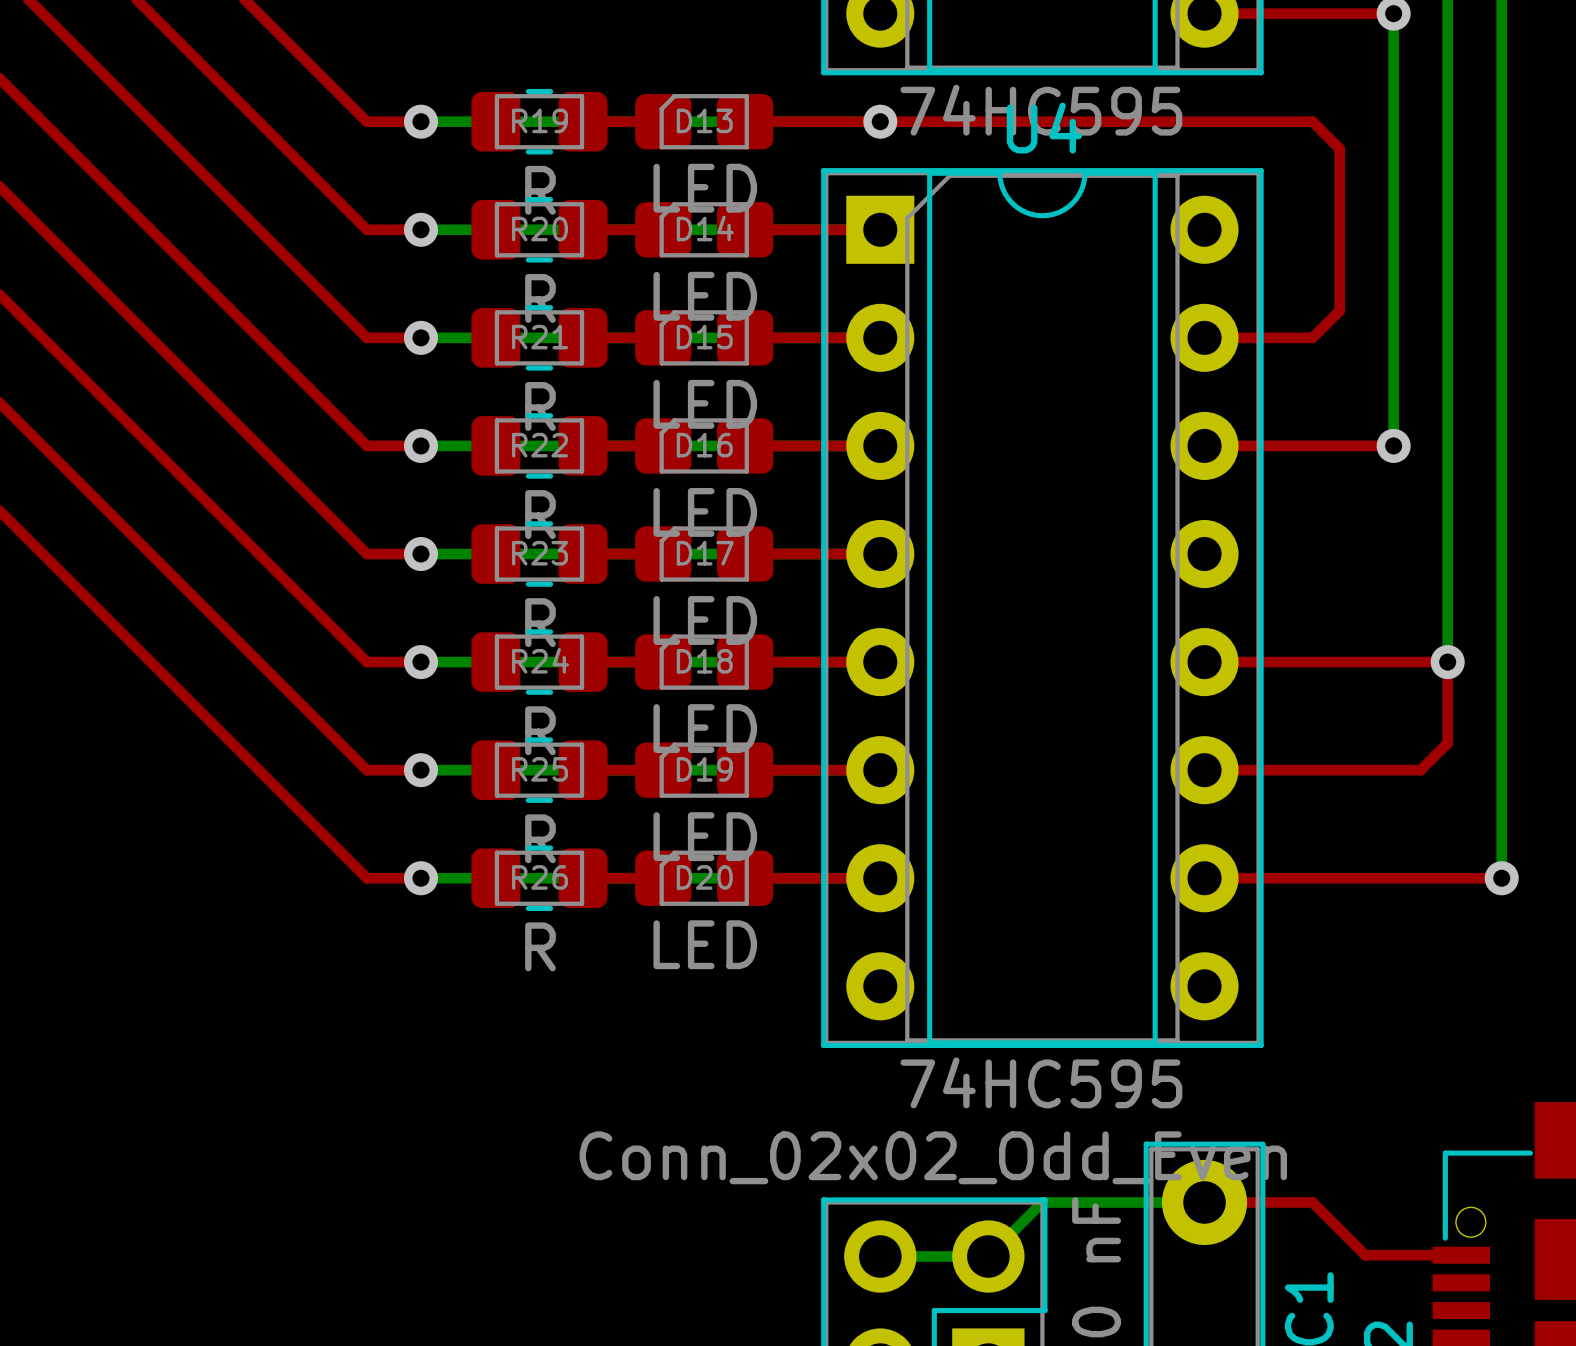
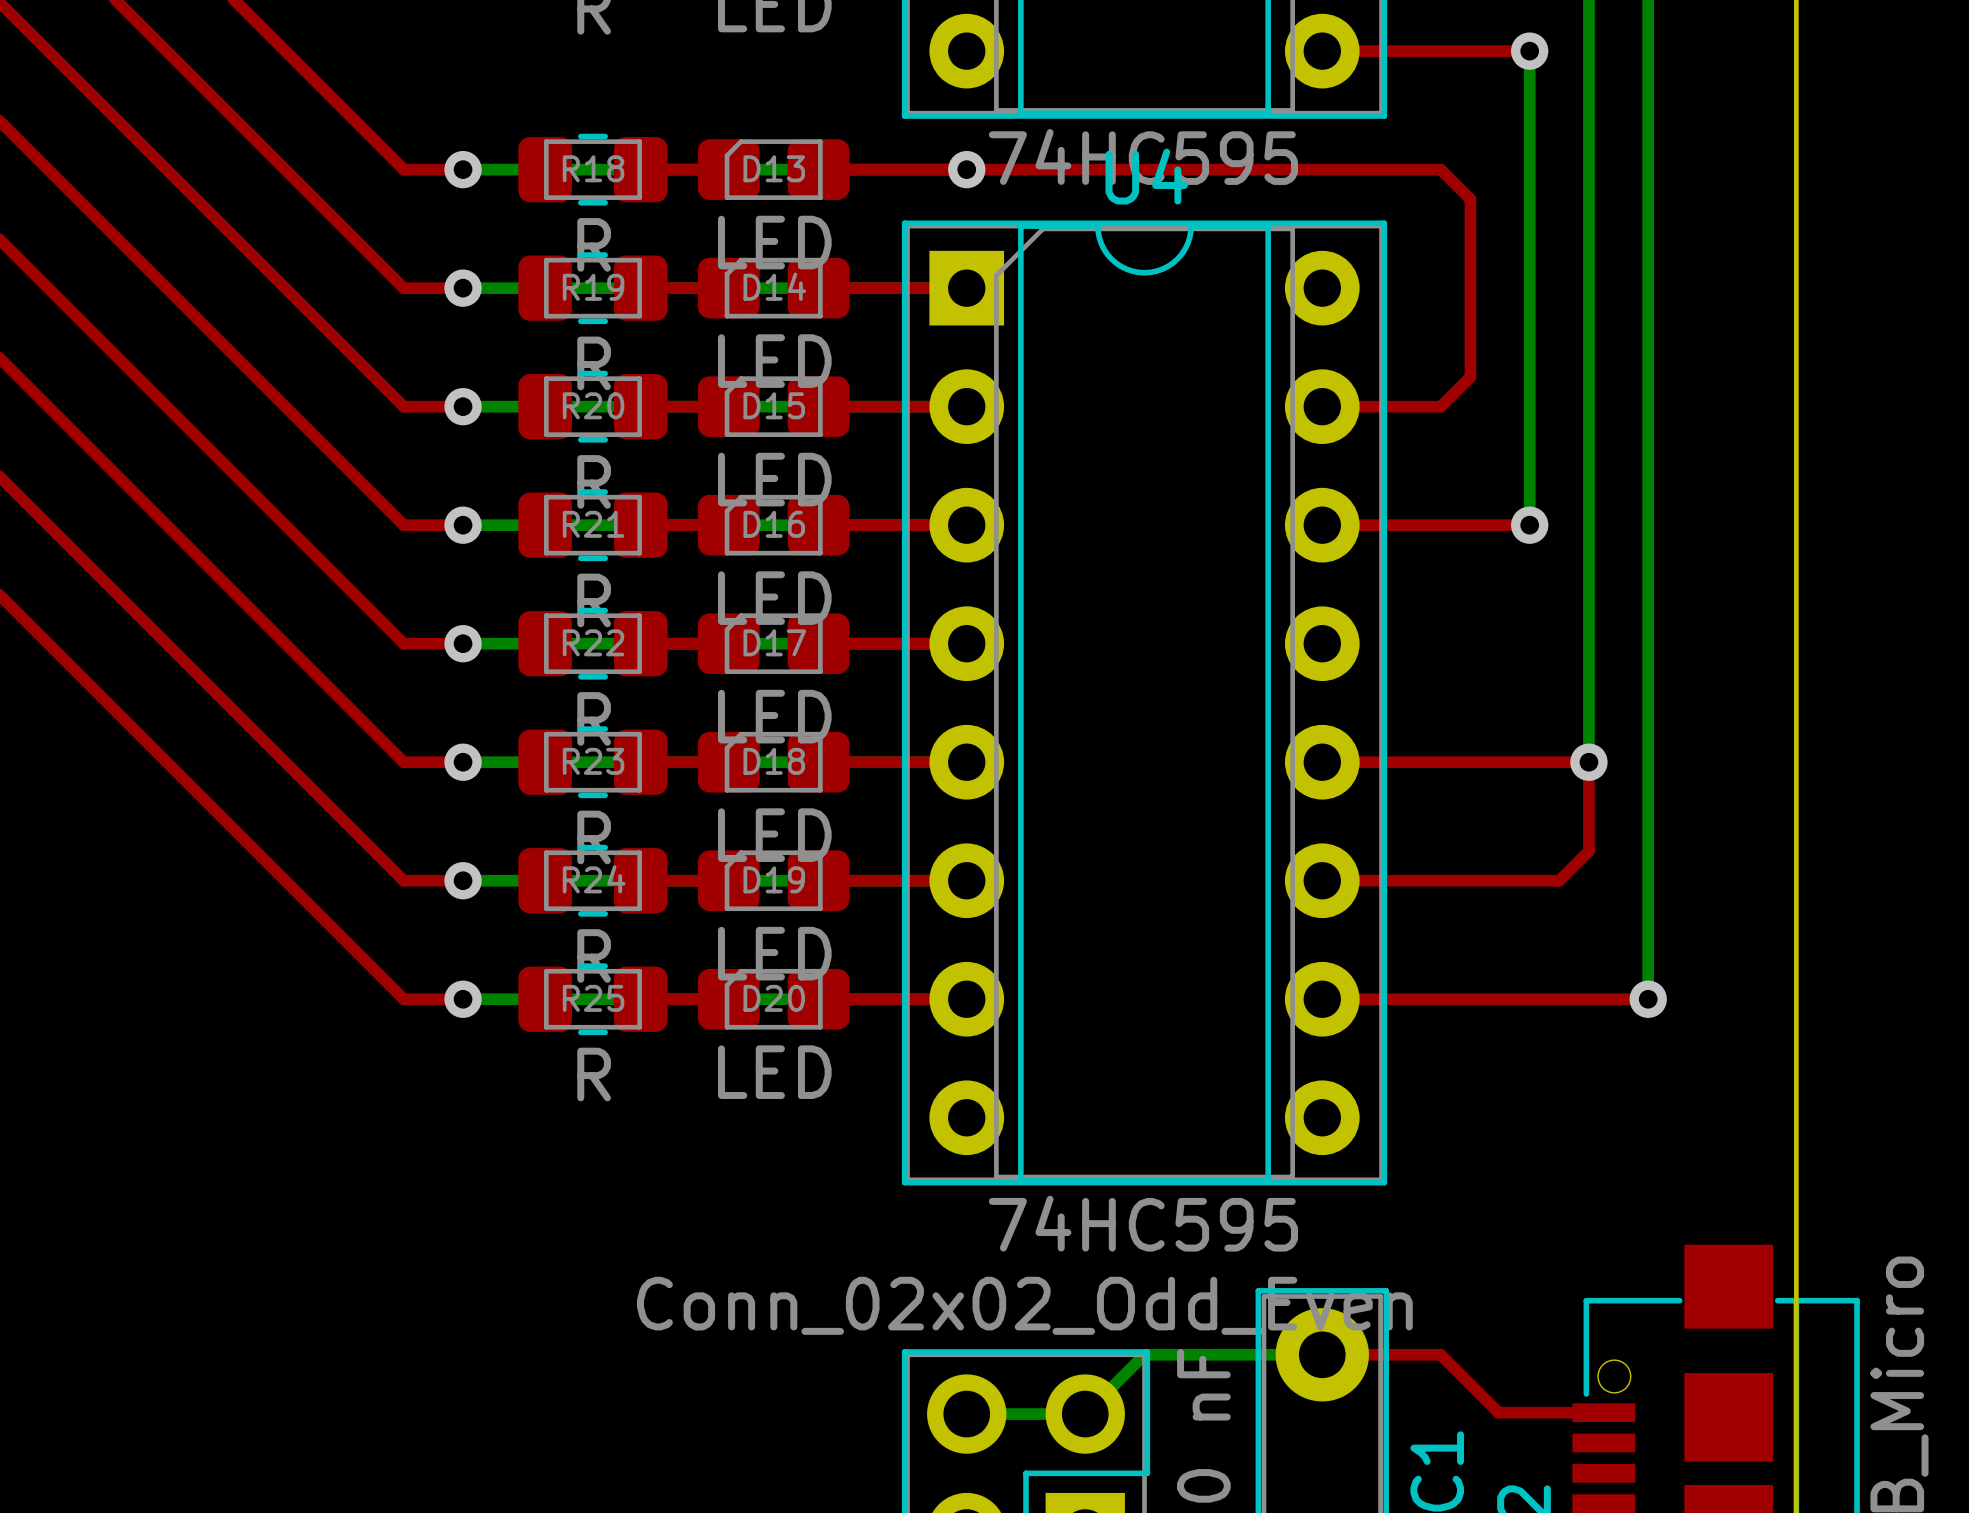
R19 name: R19 (539, 120) -> R18 (593, 168)
R20 name: R20 (539, 228) -> R19 (593, 287)
R21 name: R21 (539, 337) -> R20 (593, 405)
R22 name: R22 (539, 445) -> R21 (593, 524)
R23 name: R23 (539, 553) -> R22 (593, 642)
R24 name: R24 (540, 660) -> R23 (593, 761)
R25 name: R25 (539, 769) -> R24 (594, 879)
R26 name: R26 (539, 877) -> R25 (593, 998)

